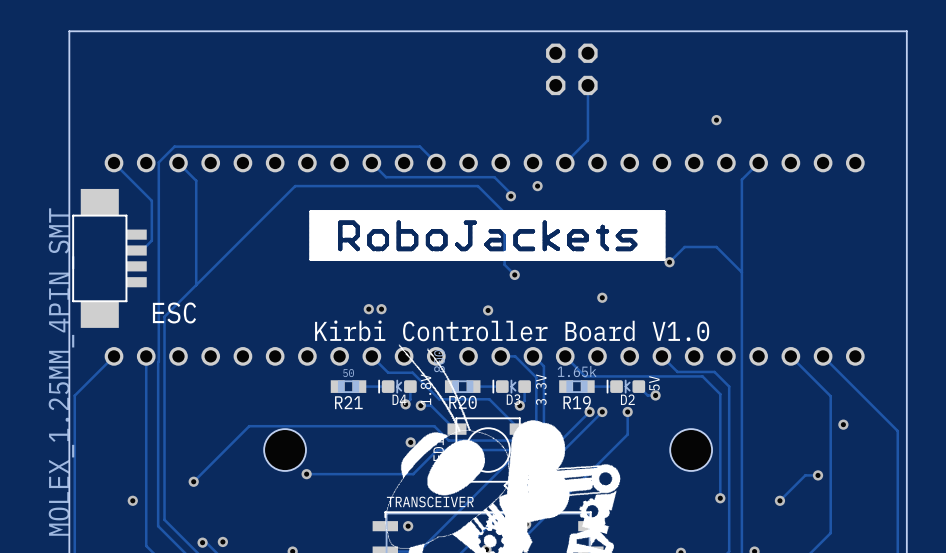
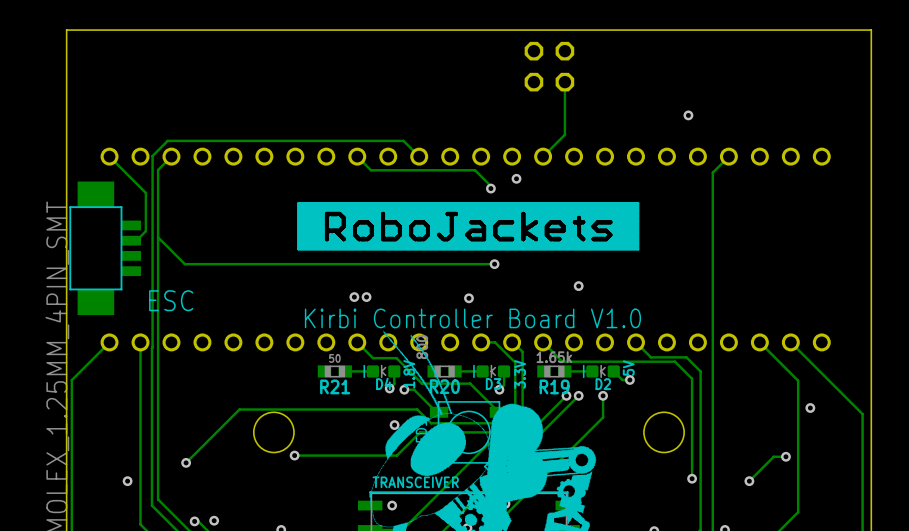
track: (178, 163) (196, 180) (196, 285) -> (171, 156) (158, 170) (158, 304)
track: (669, 262) (684, 247) (716, 247) (741, 272) -> none
via: (669, 262) -> none
track: (514, 274) (504, 264) (504, 212) (477, 186) (295, 186) (164, 316) -> (494, 264) (184, 264) (158, 237)

